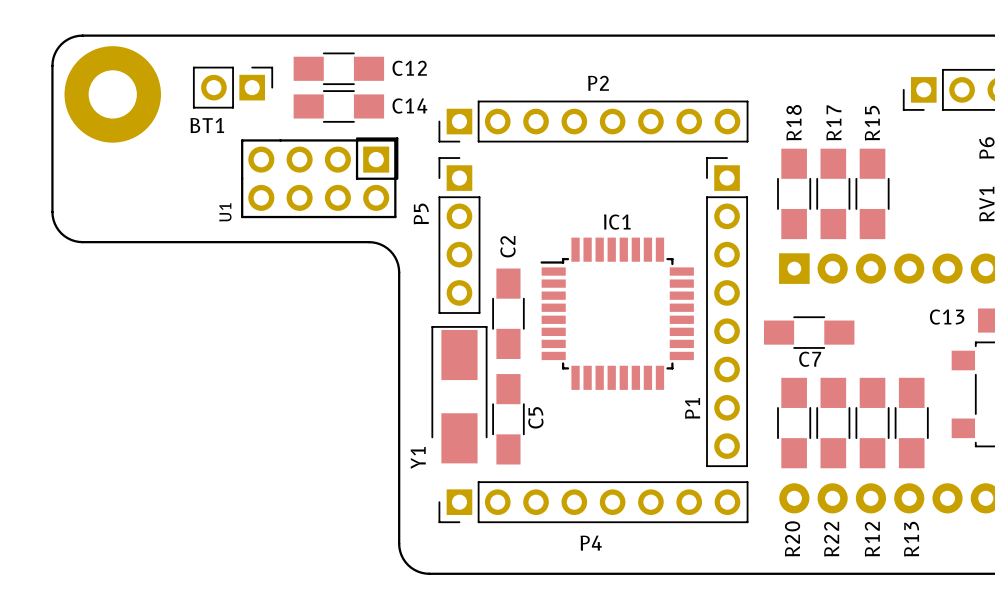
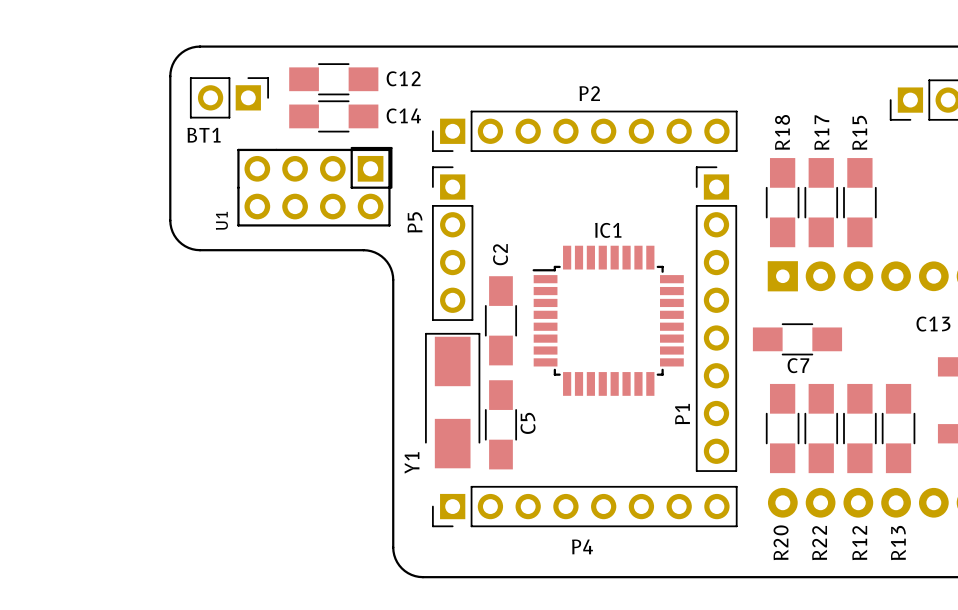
board edge: (203, 35) (74, 36) (67, 39) (58, 47) (54, 54) (52, 65) (52, 211) (54, 223) (58, 230) (67, 238) (78, 241) (203, 242) -> (200, 46) (188, 48) (179, 55) (172, 64) (170, 76) (170, 224) (174, 235) (181, 244) (188, 247) (200, 250)
part: (112, 94) -> none

